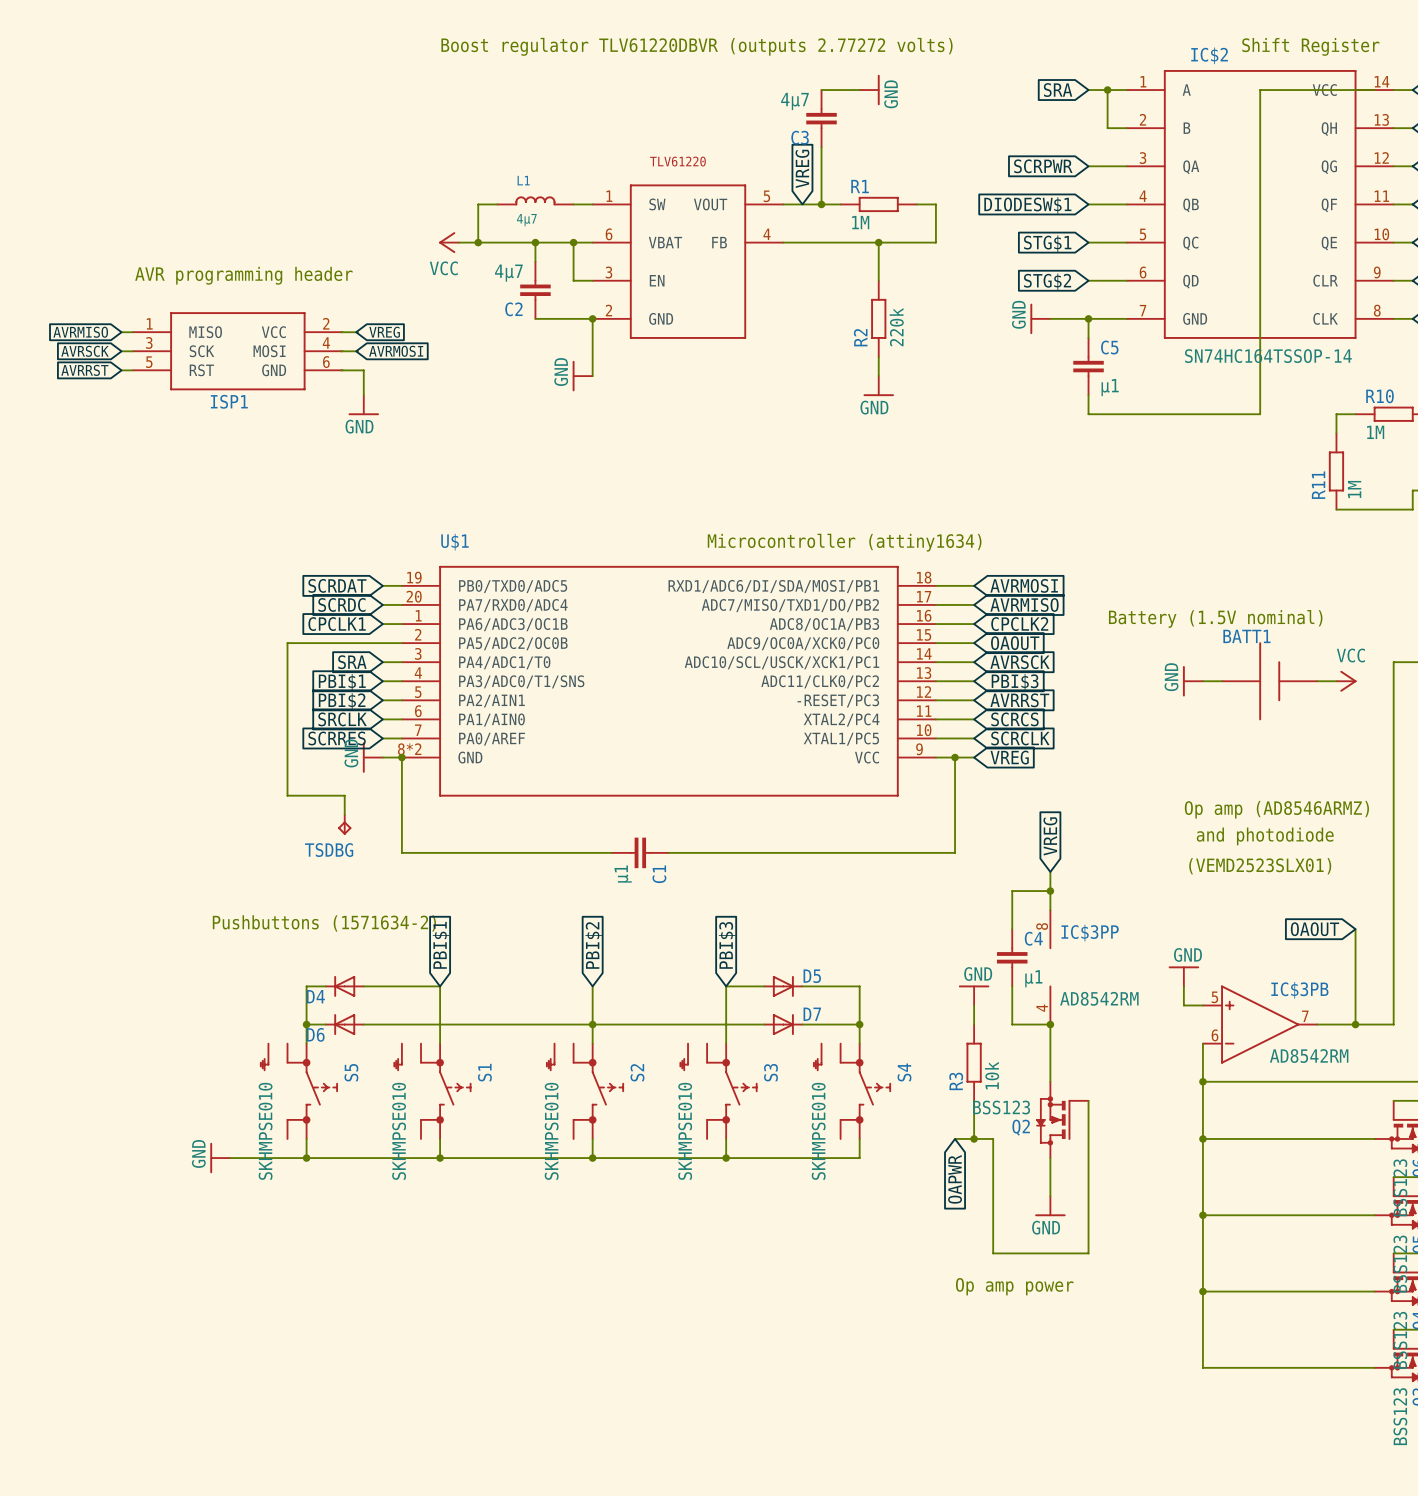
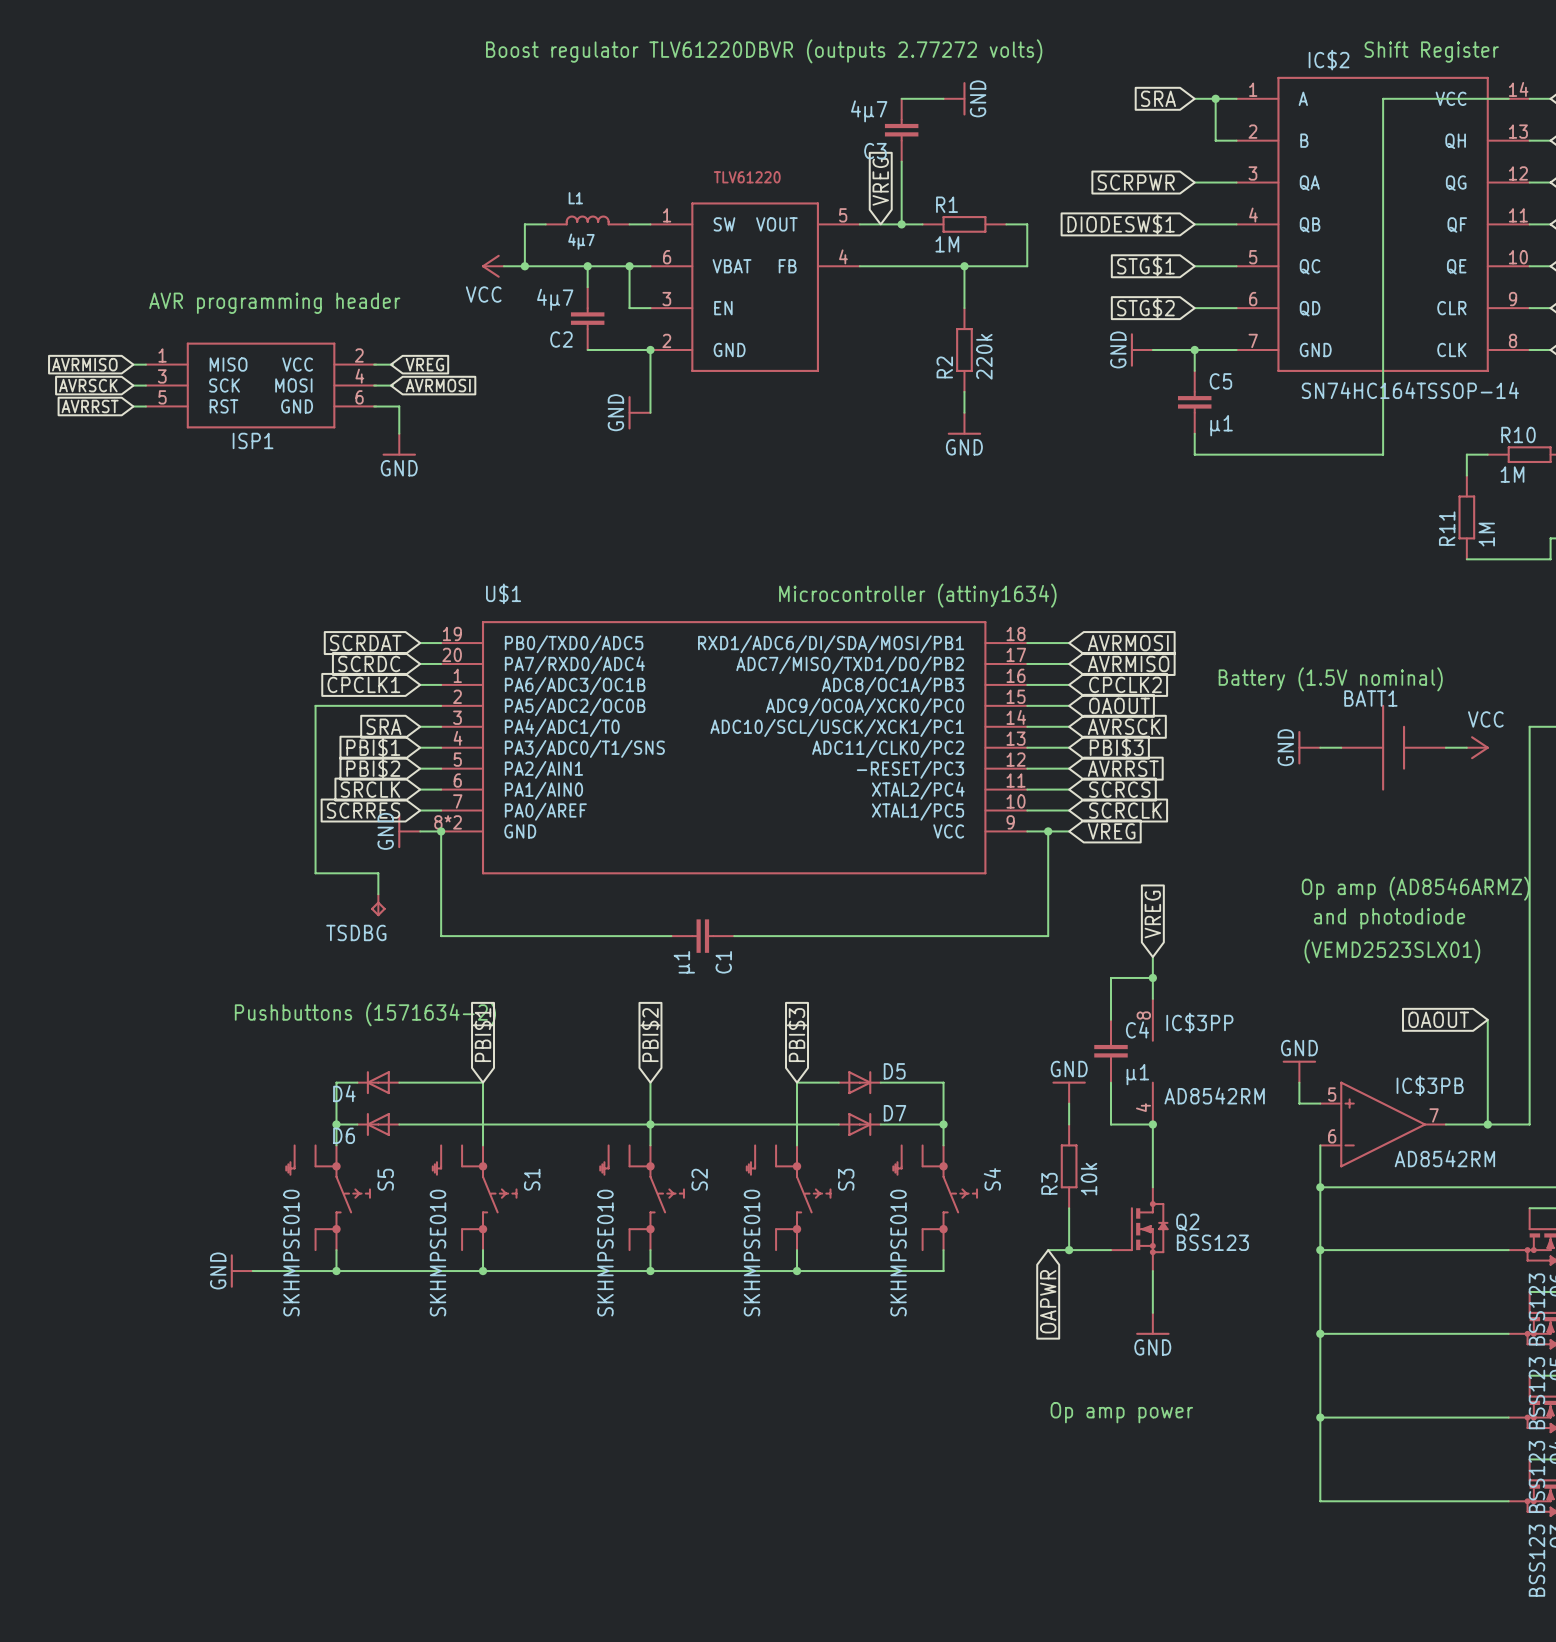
wire: (1088, 1100) (1088, 1253) (993, 1253) (993, 1138) -> (1110, 1250) (1090, 1250)
Q2 rotation: 0° (1053, 1120) -> 180° (1149, 1228)

